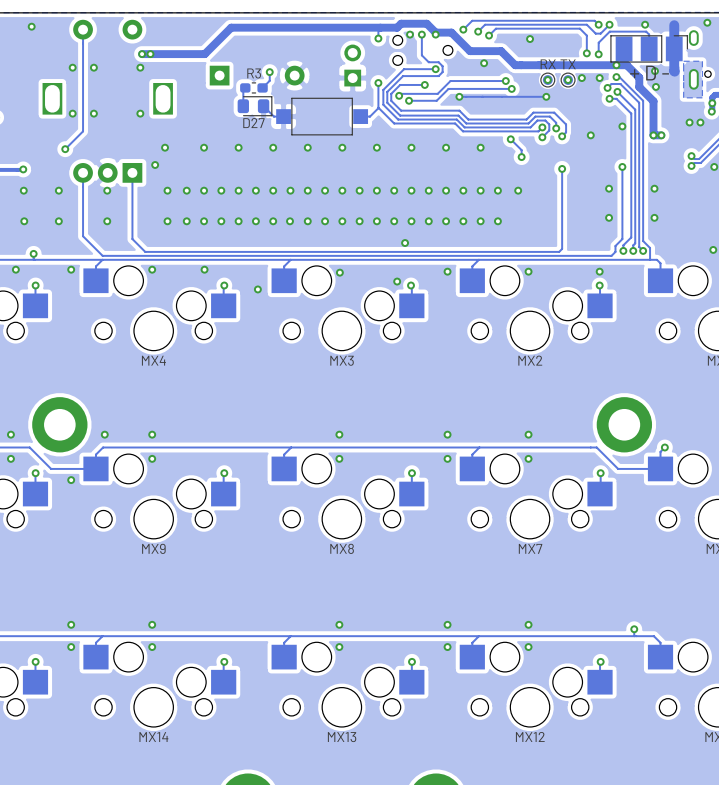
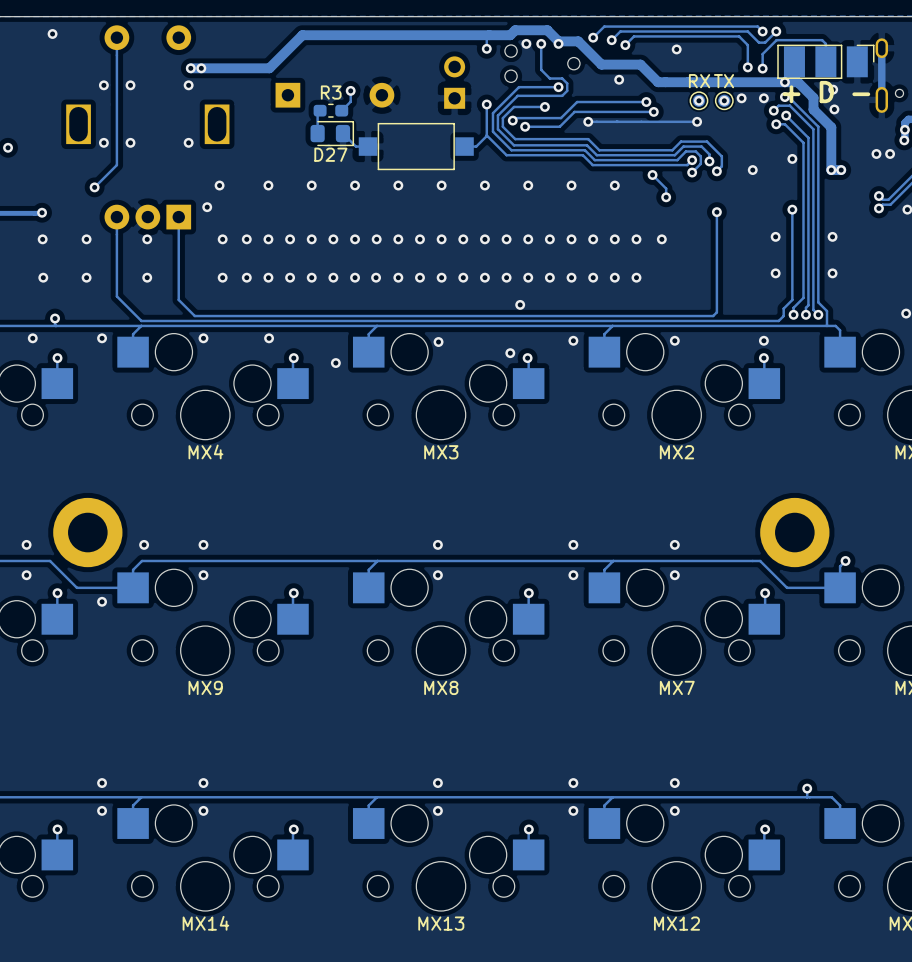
via: (707, 22) -> none
via: (645, 24) -> none
track: (674, 25) (674, 71) -> none
track: none -> (881, 48) (881, 99)
zone outline: (702, 61) (683, 61) (683, 97) (702, 97) (702, 61) -> none

